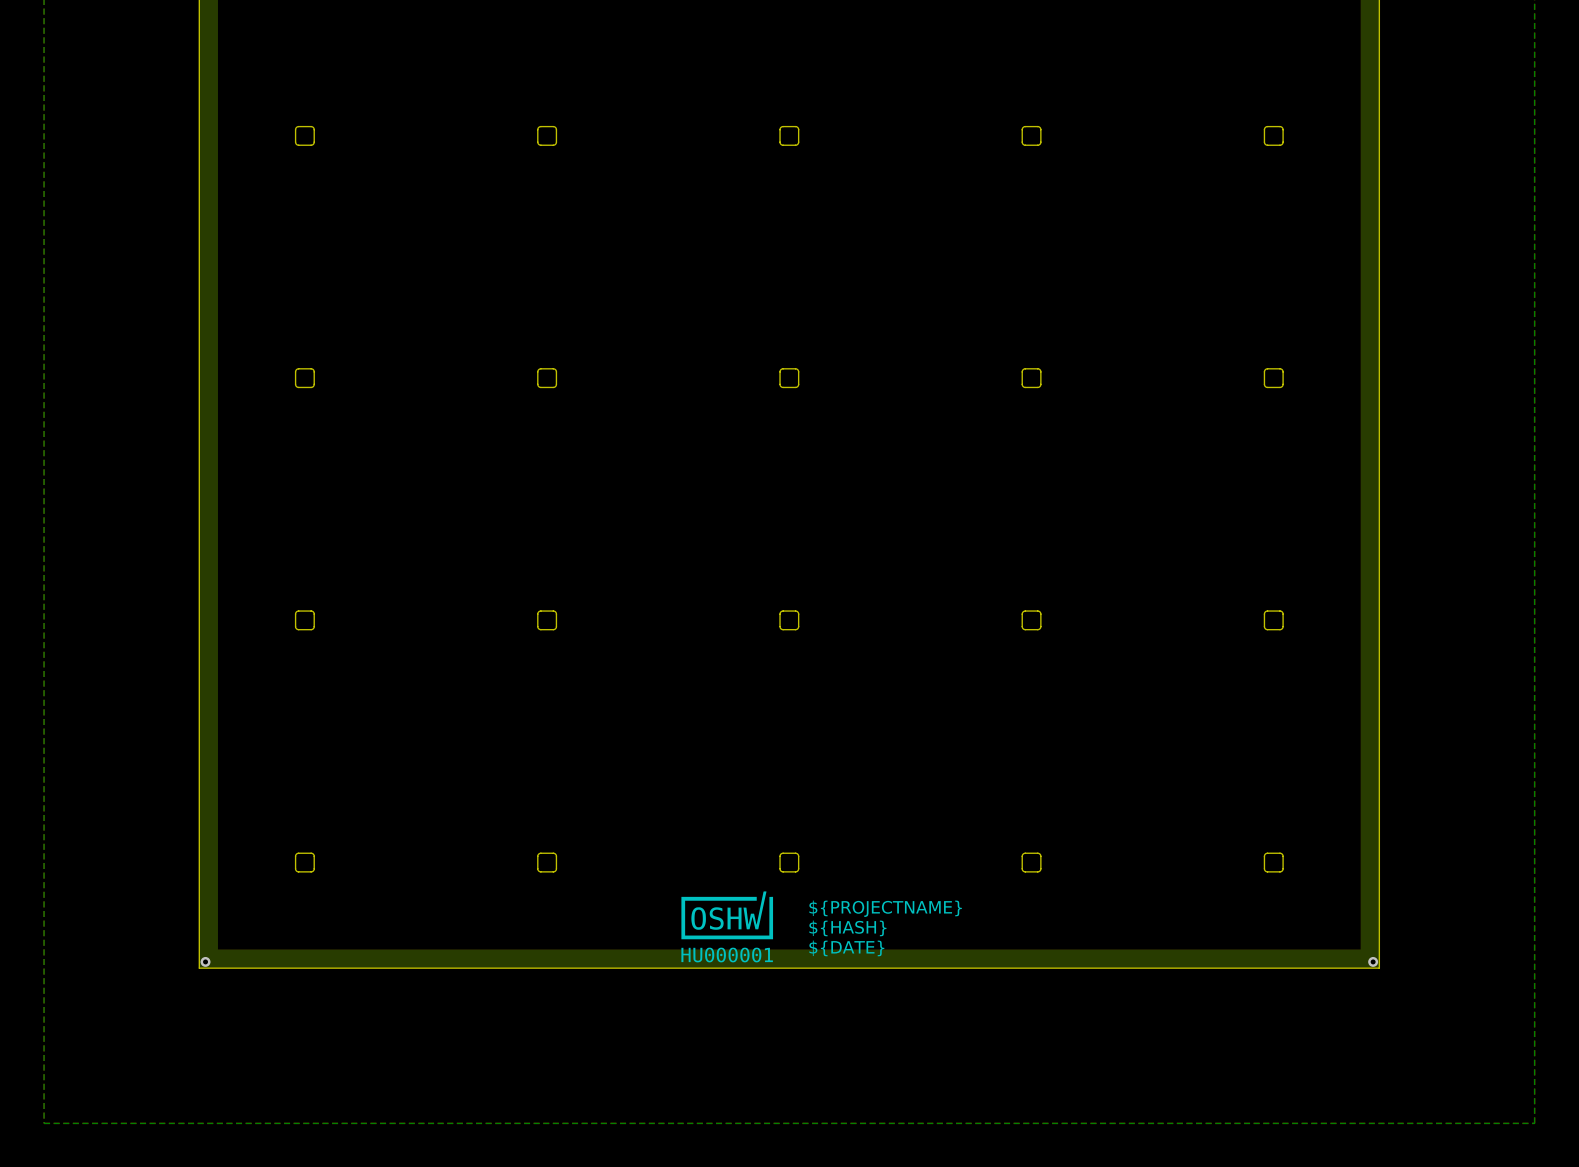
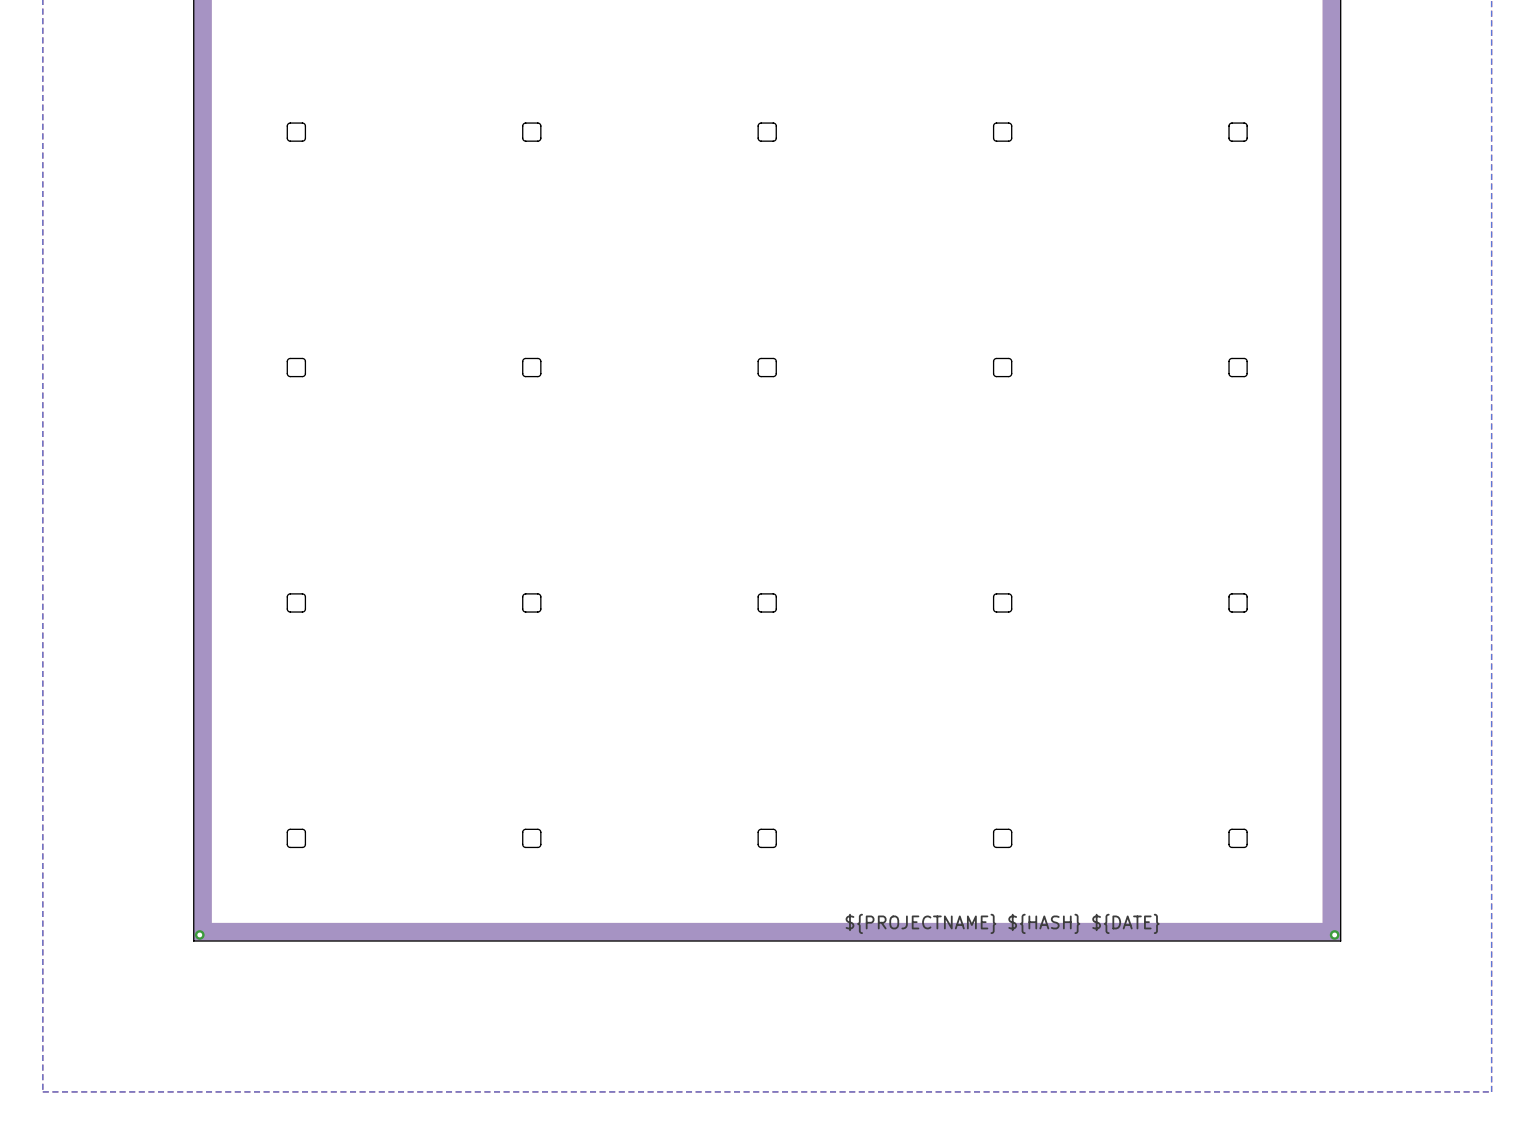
drawing: [681, 891, 774, 963] -> none
text: ${PROJECTNAME} (885, 908) -> none
text: ${HASH} (847, 928) -> none
text: ${DATE} (846, 948) -> none
text: none -> ${PROJECTNAME} ${HASH} ${DATE} (1002, 923)

